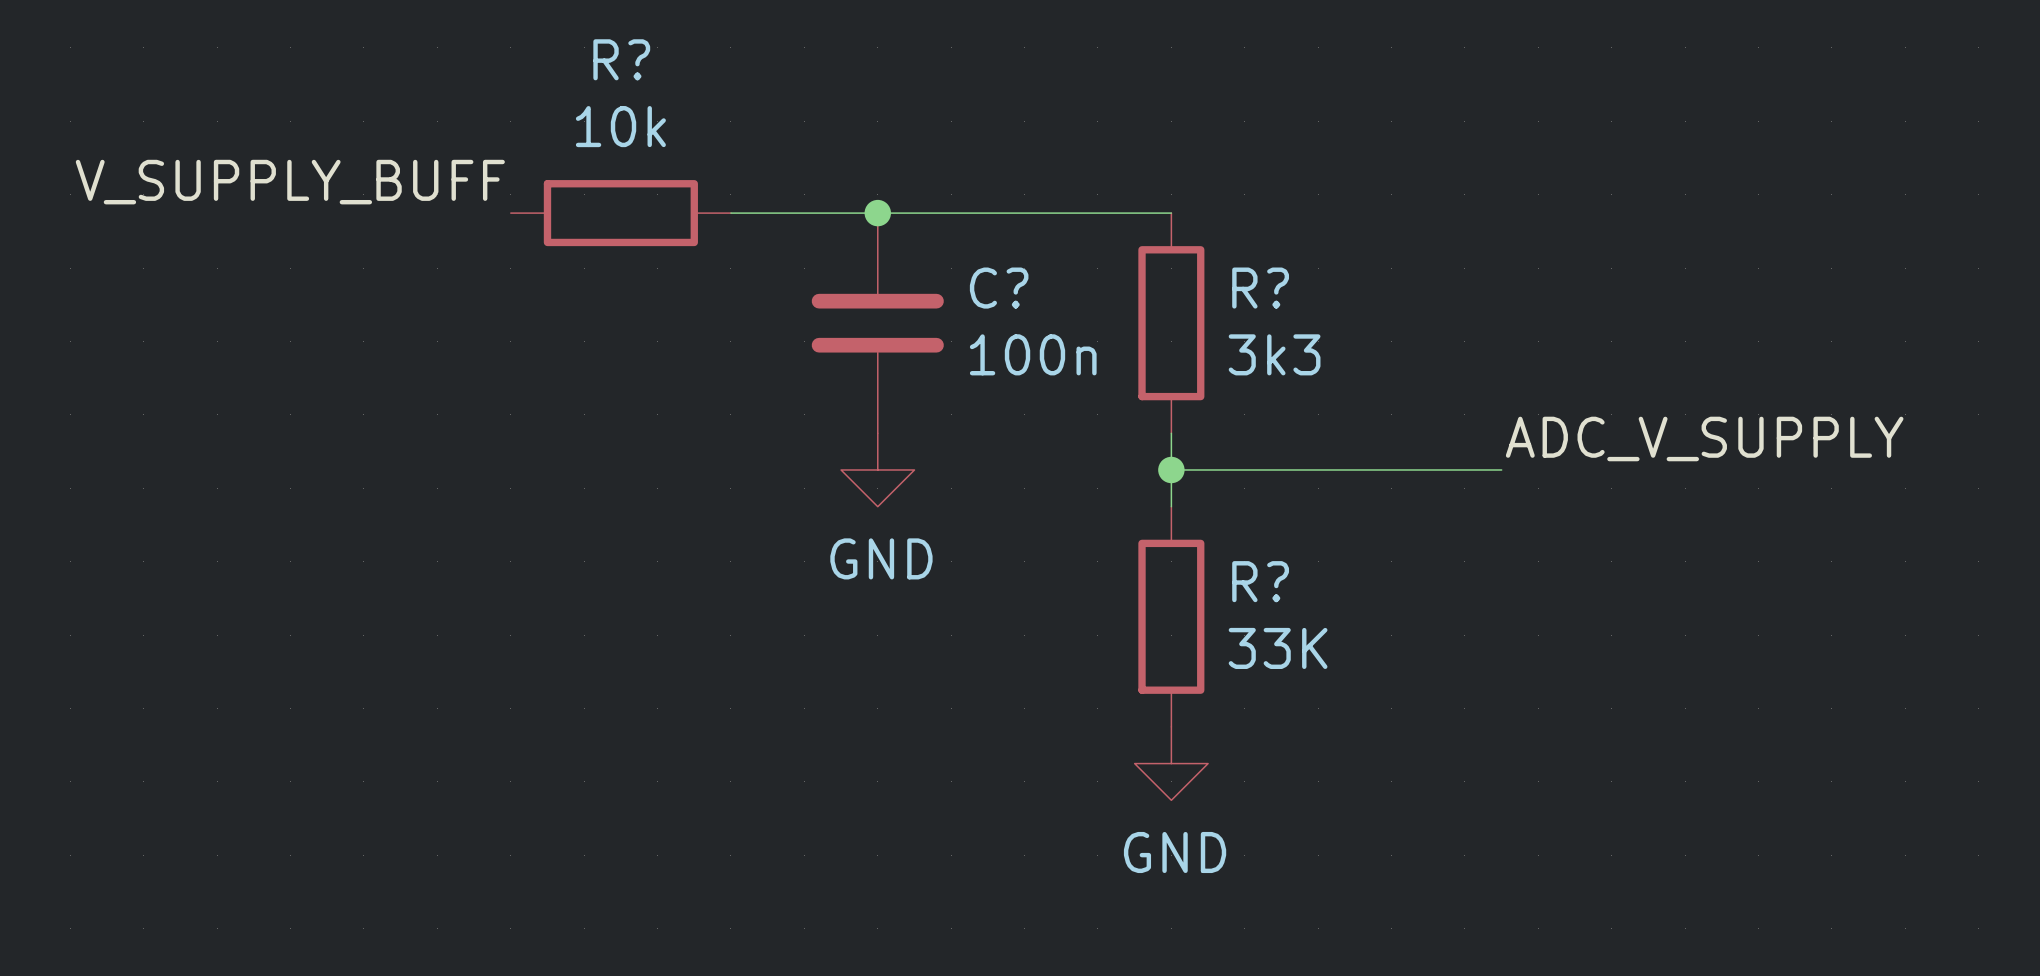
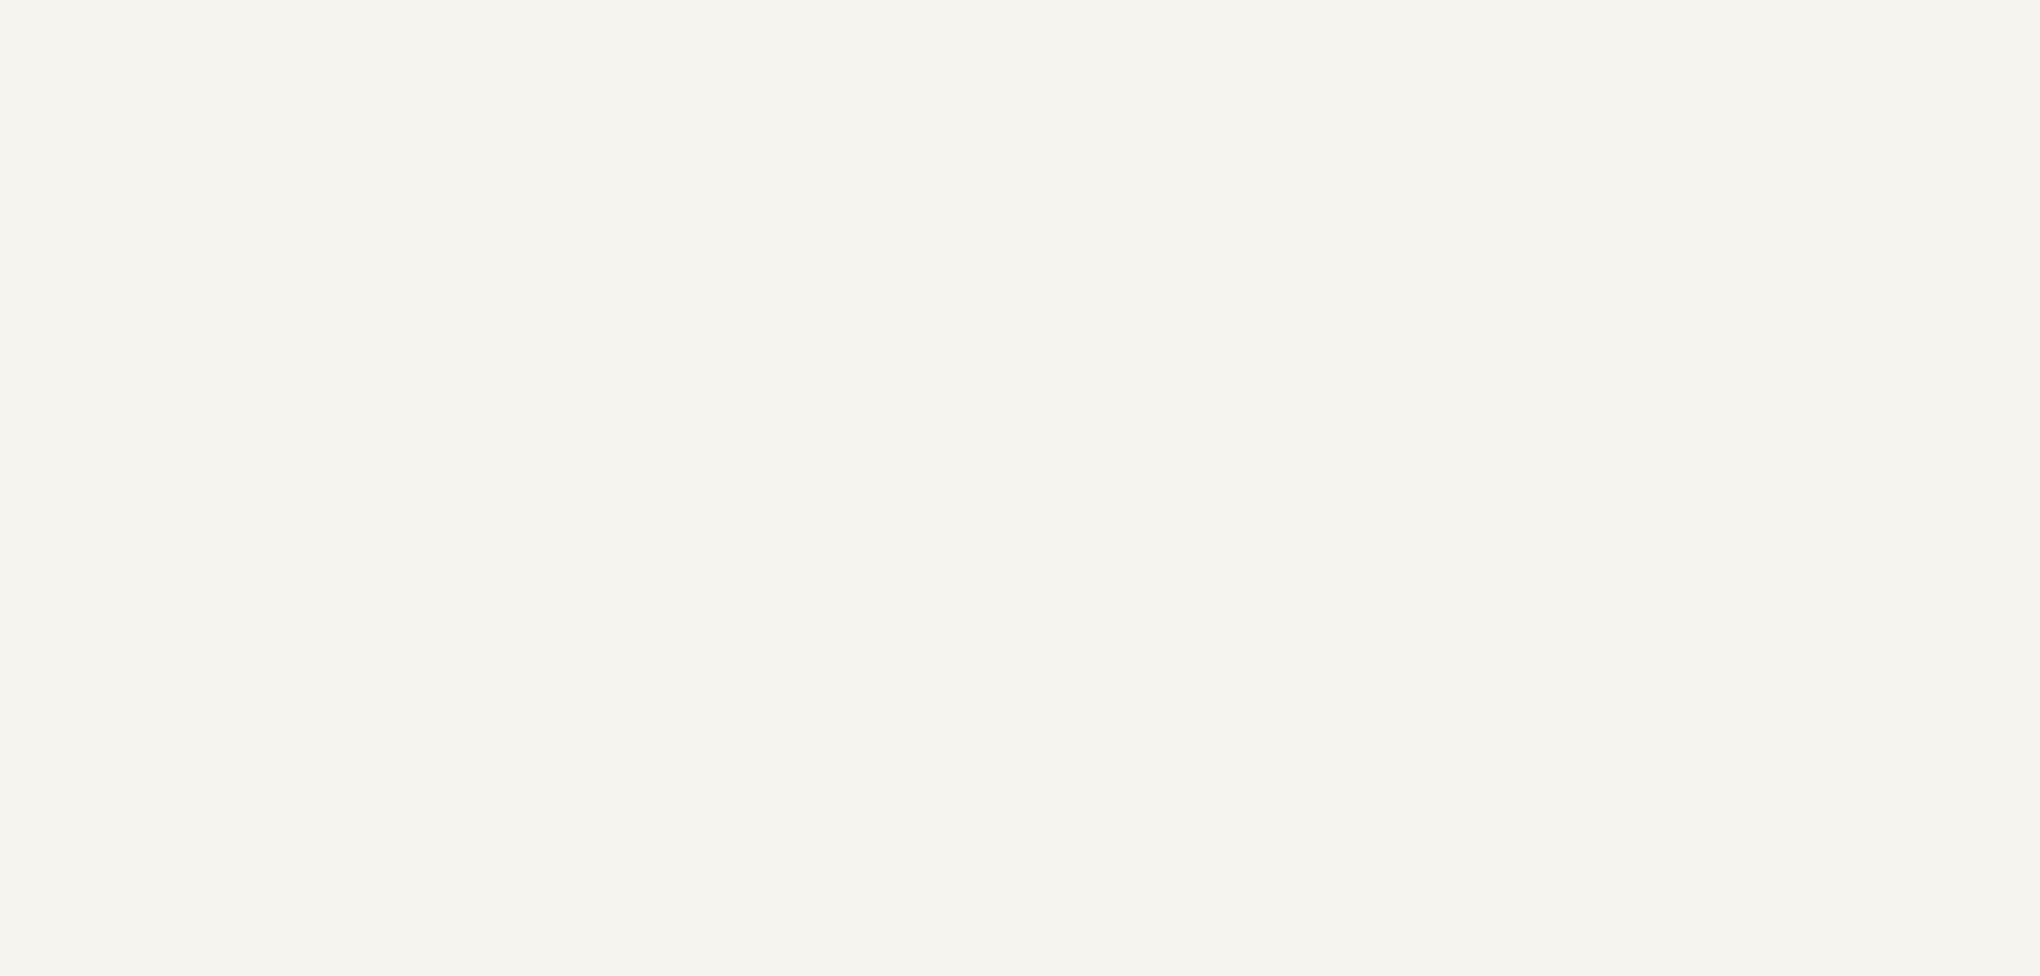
label: V_SUPPLY_BUFF (290, 182) -> none
R?: 10k (620, 213) -> none
wire: (730, 213) (1171, 213) -> none
junction: (877, 213) -> none
C?: 100n (877, 323) -> none
R?: 3k3 (1171, 323) -> none
wire: (1171, 433) (1171, 506) -> none
label: ADC_V_SUPPLY (1704, 438) -> none
power symbol: GND (877, 469) -> none
wire: (1171, 469) (1501, 469) -> none
junction: (1171, 469) -> none
R?: 33K (1171, 616) -> none
power symbol: GND (1171, 763) -> none

